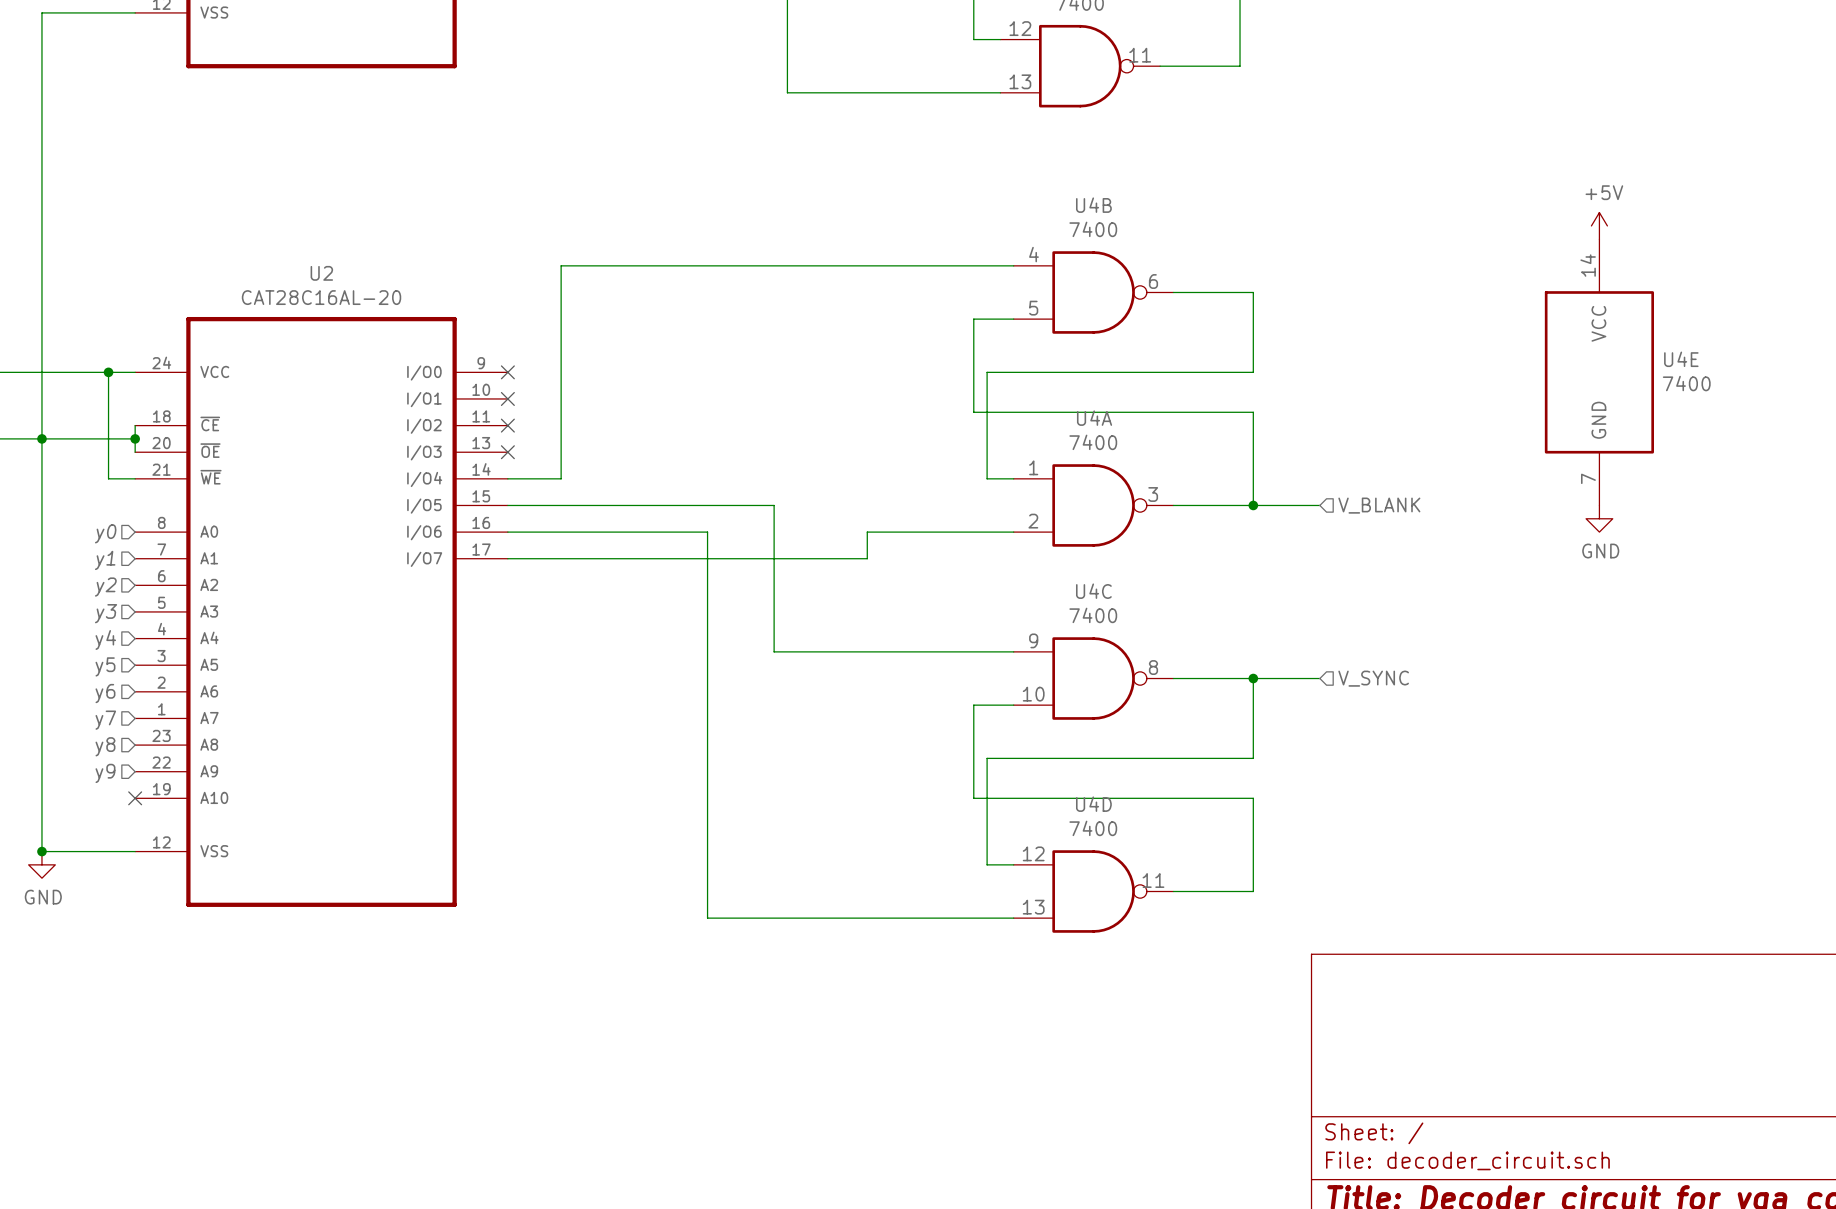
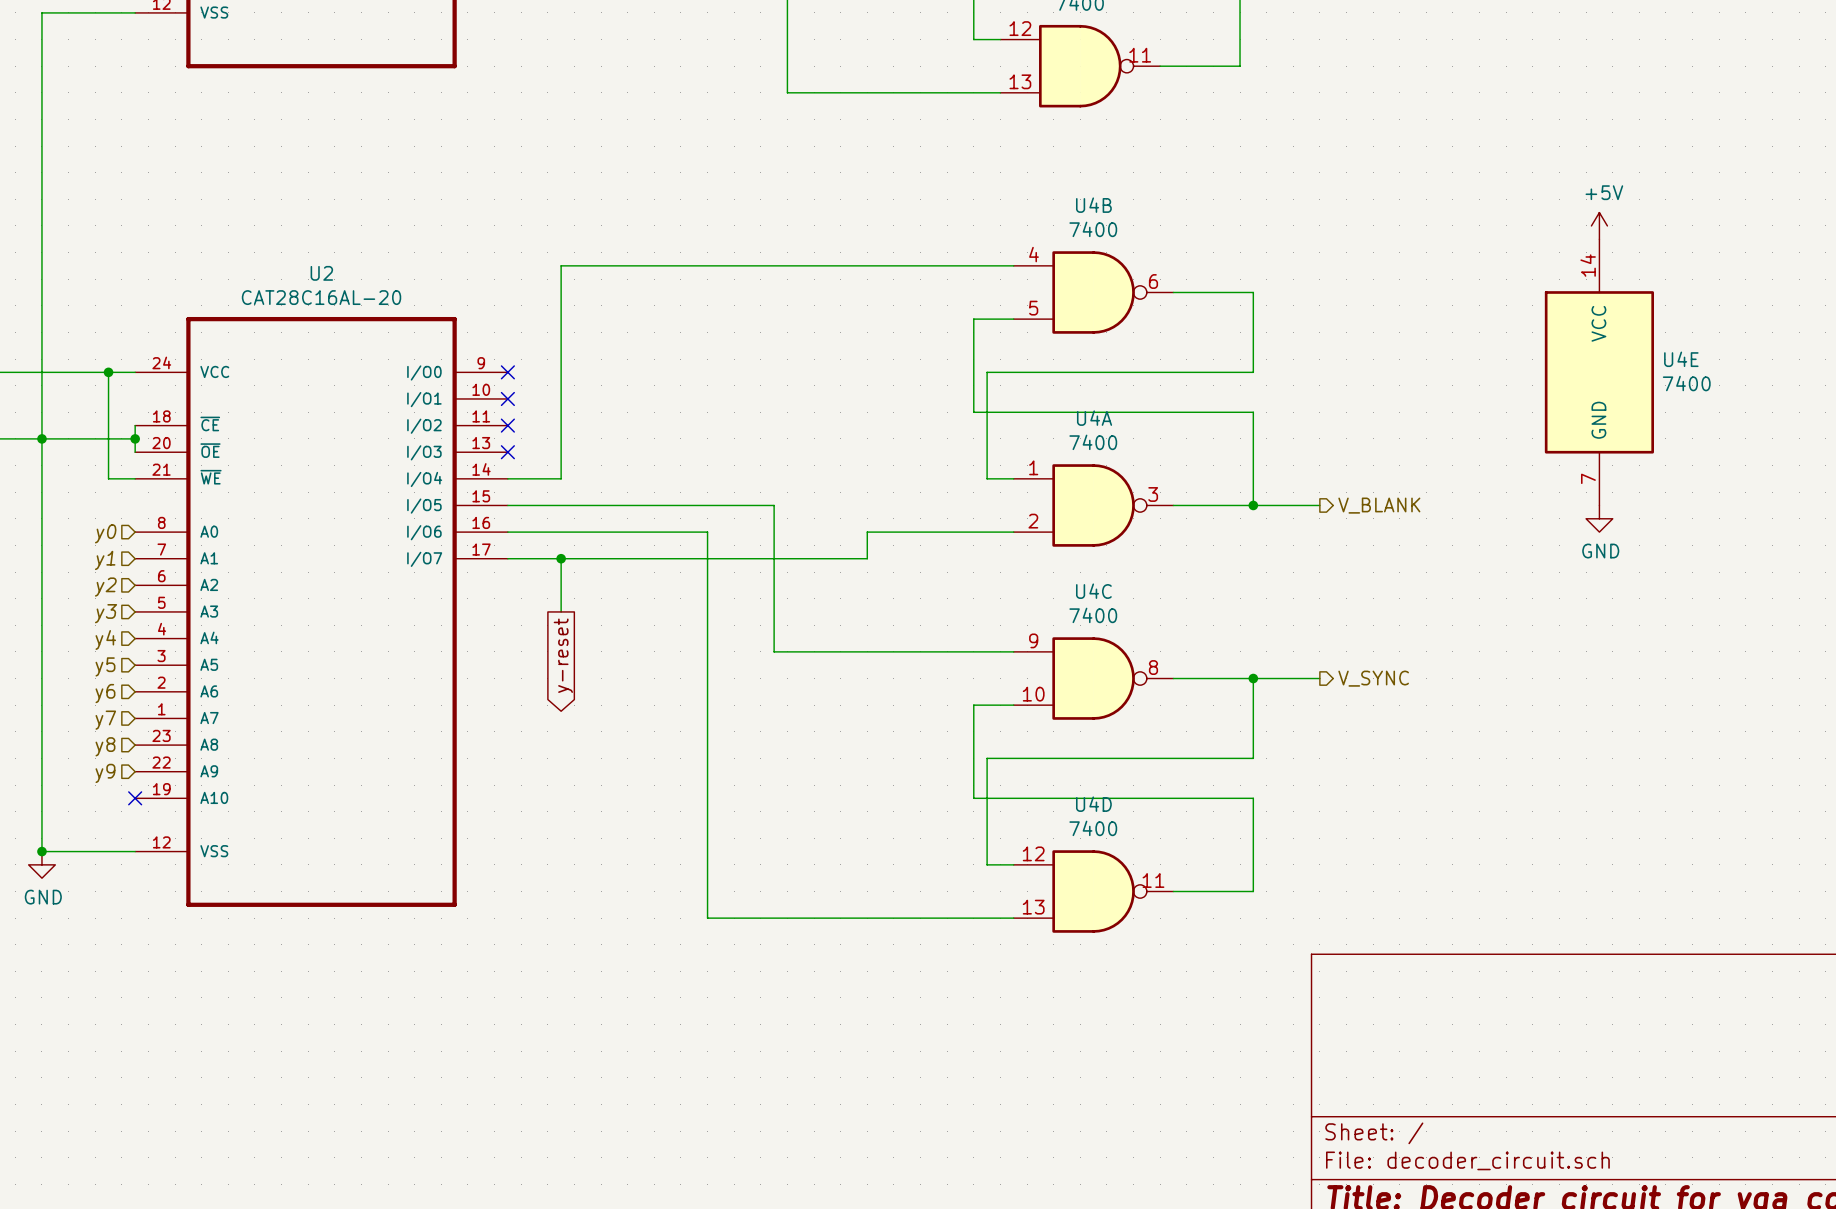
hierarchical label shape: input (1379, 505) -> output (1379, 505)
wire: none -> (561, 558) (561, 611)
junction: none -> (561, 558)
global label: none -> y-reset (563, 655)
hierarchical label shape: input (1373, 678) -> output (1373, 678)

